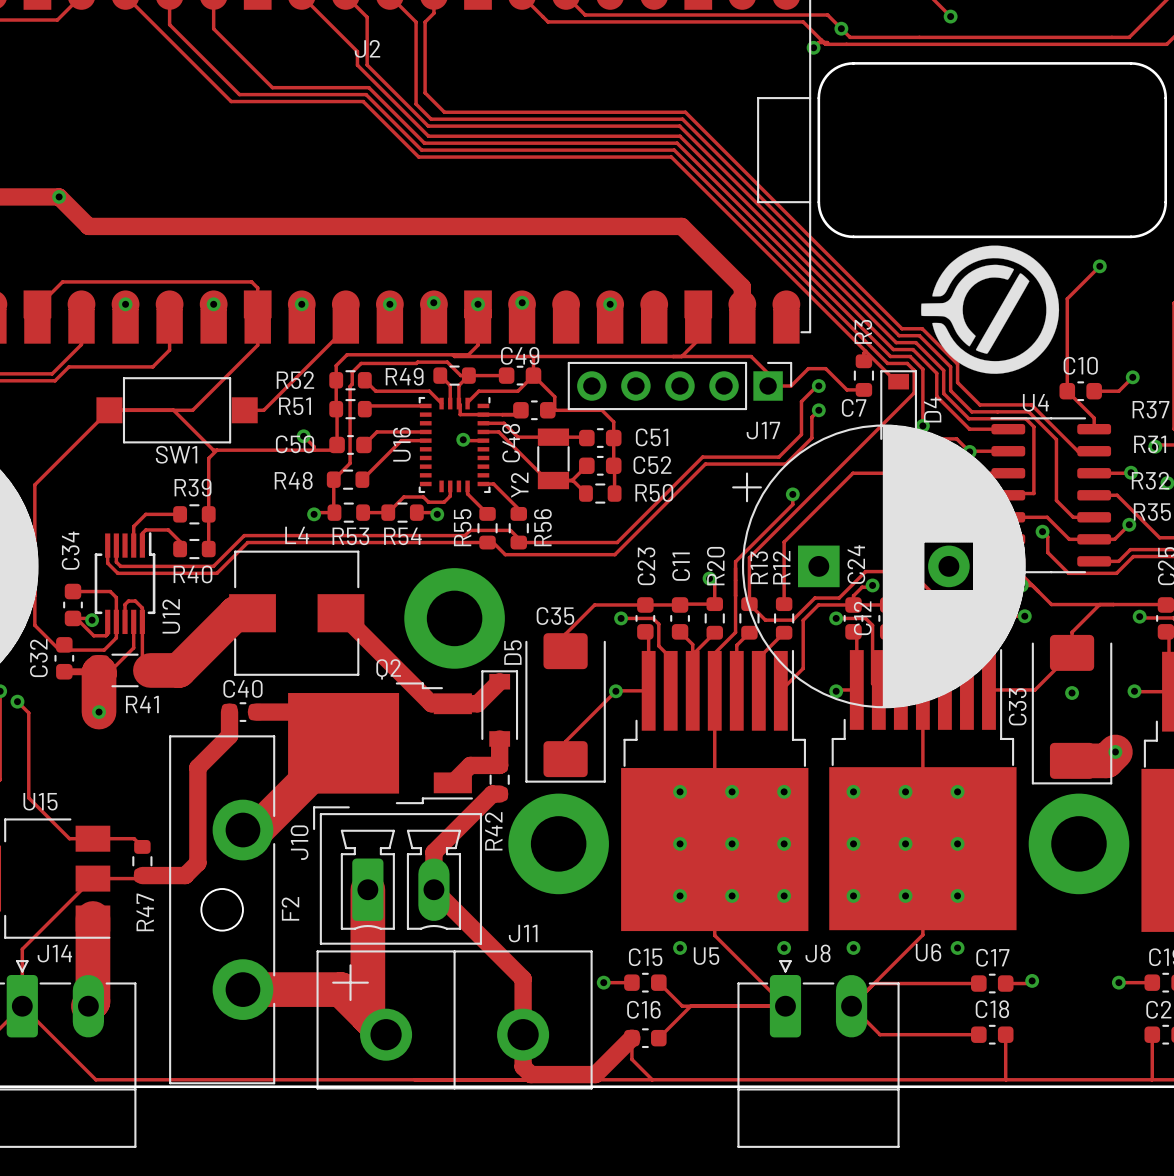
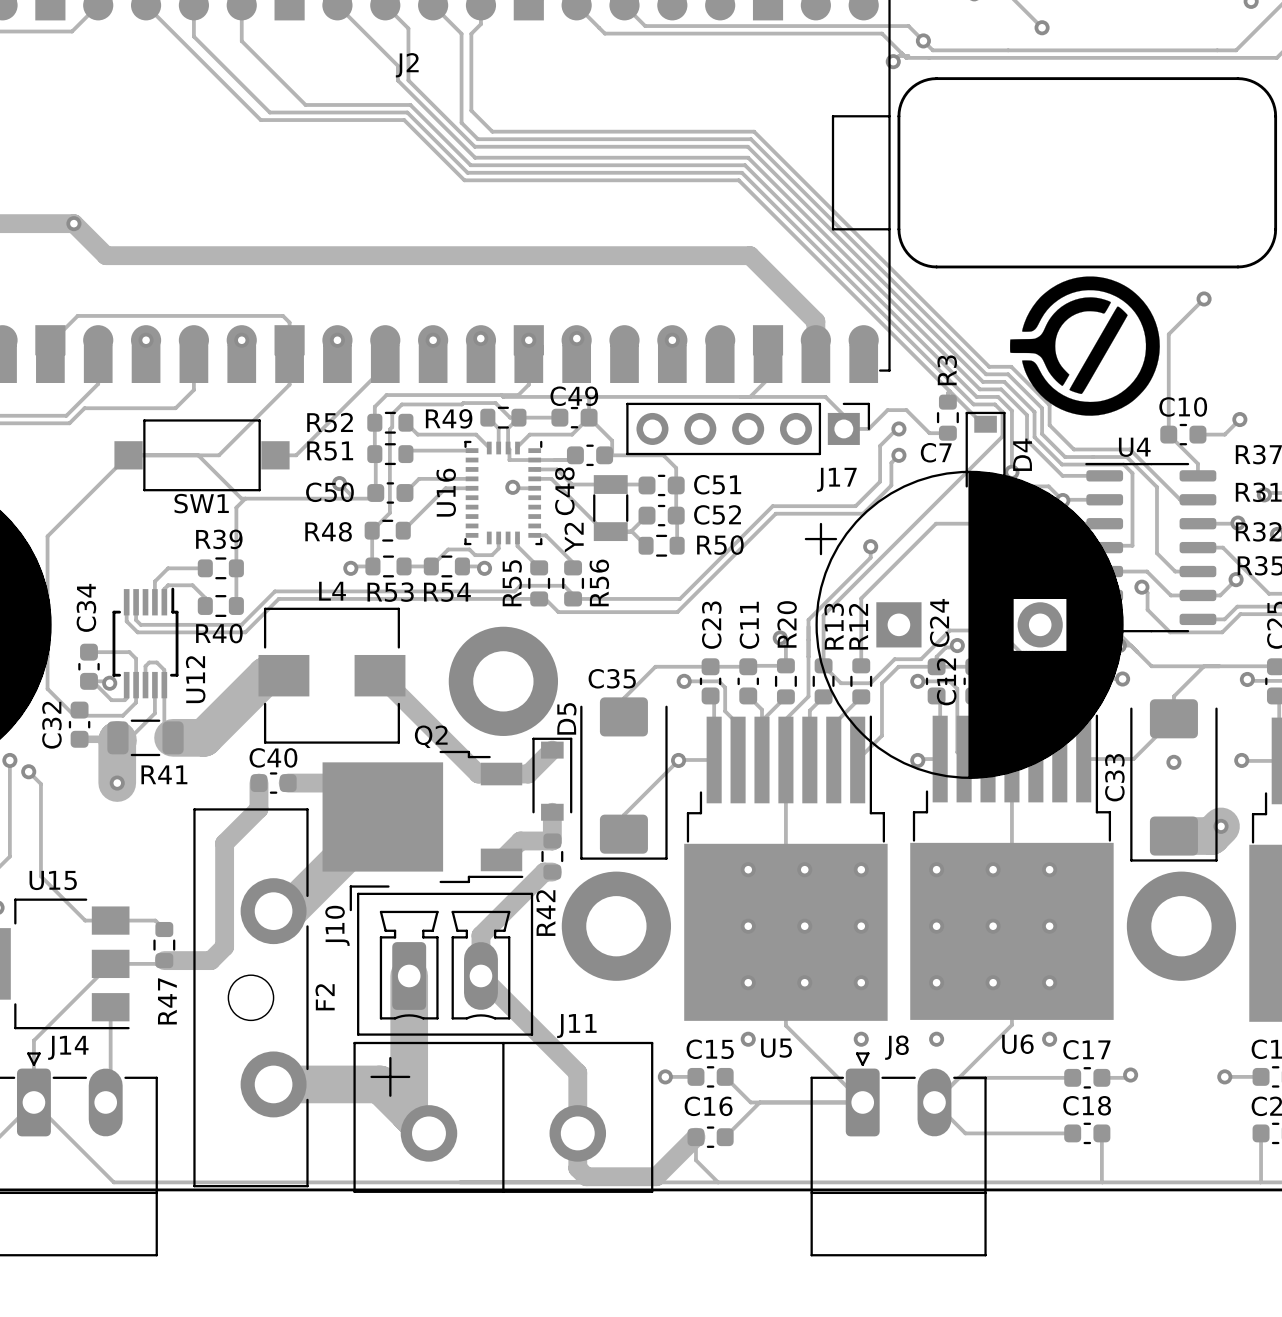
track width: thick (92, 918) (92, 1001) (88, 1006) -> thin (110, 1007) (110, 1097) (105, 1102)

